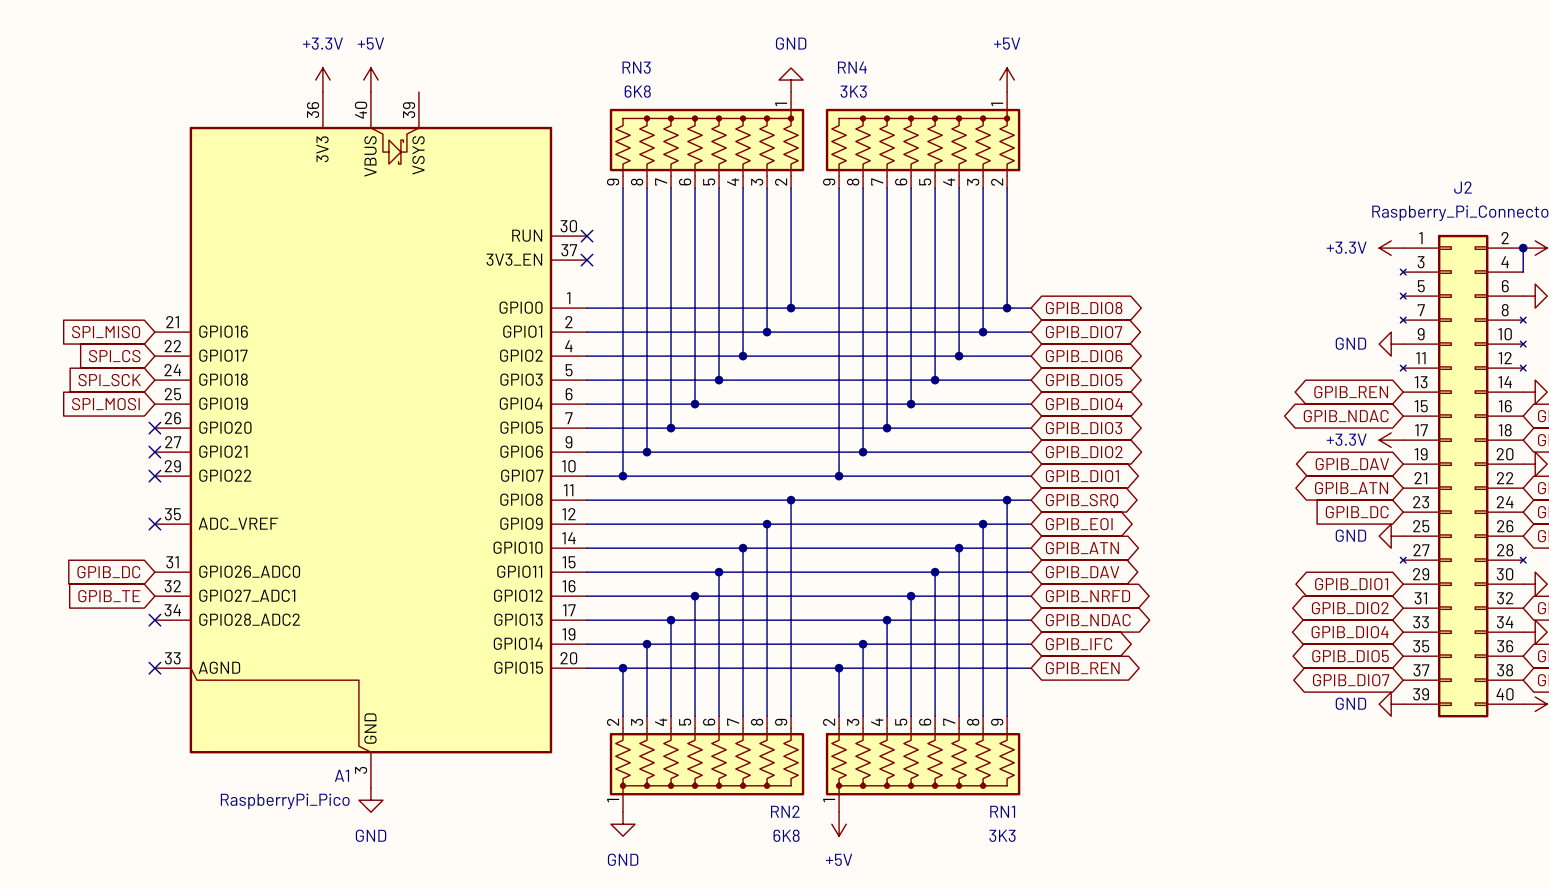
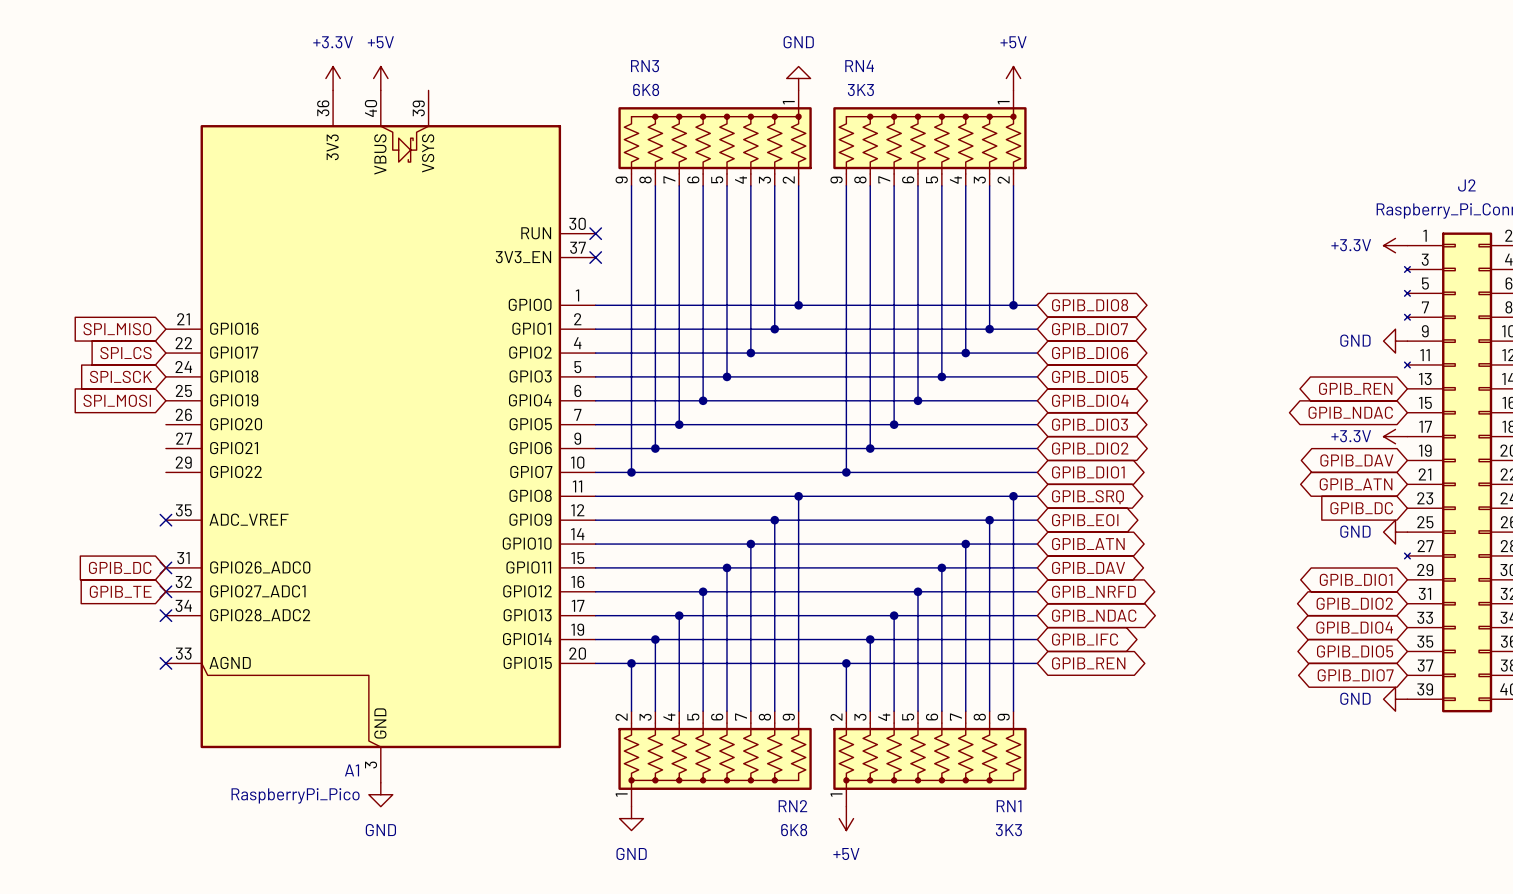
no-connect mark: (154, 428) -> none
no-connect mark: (154, 452) -> none
no-connect mark: (154, 476) -> none
no-connect mark: none -> (165, 567)
no-connect mark: none -> (165, 591)

